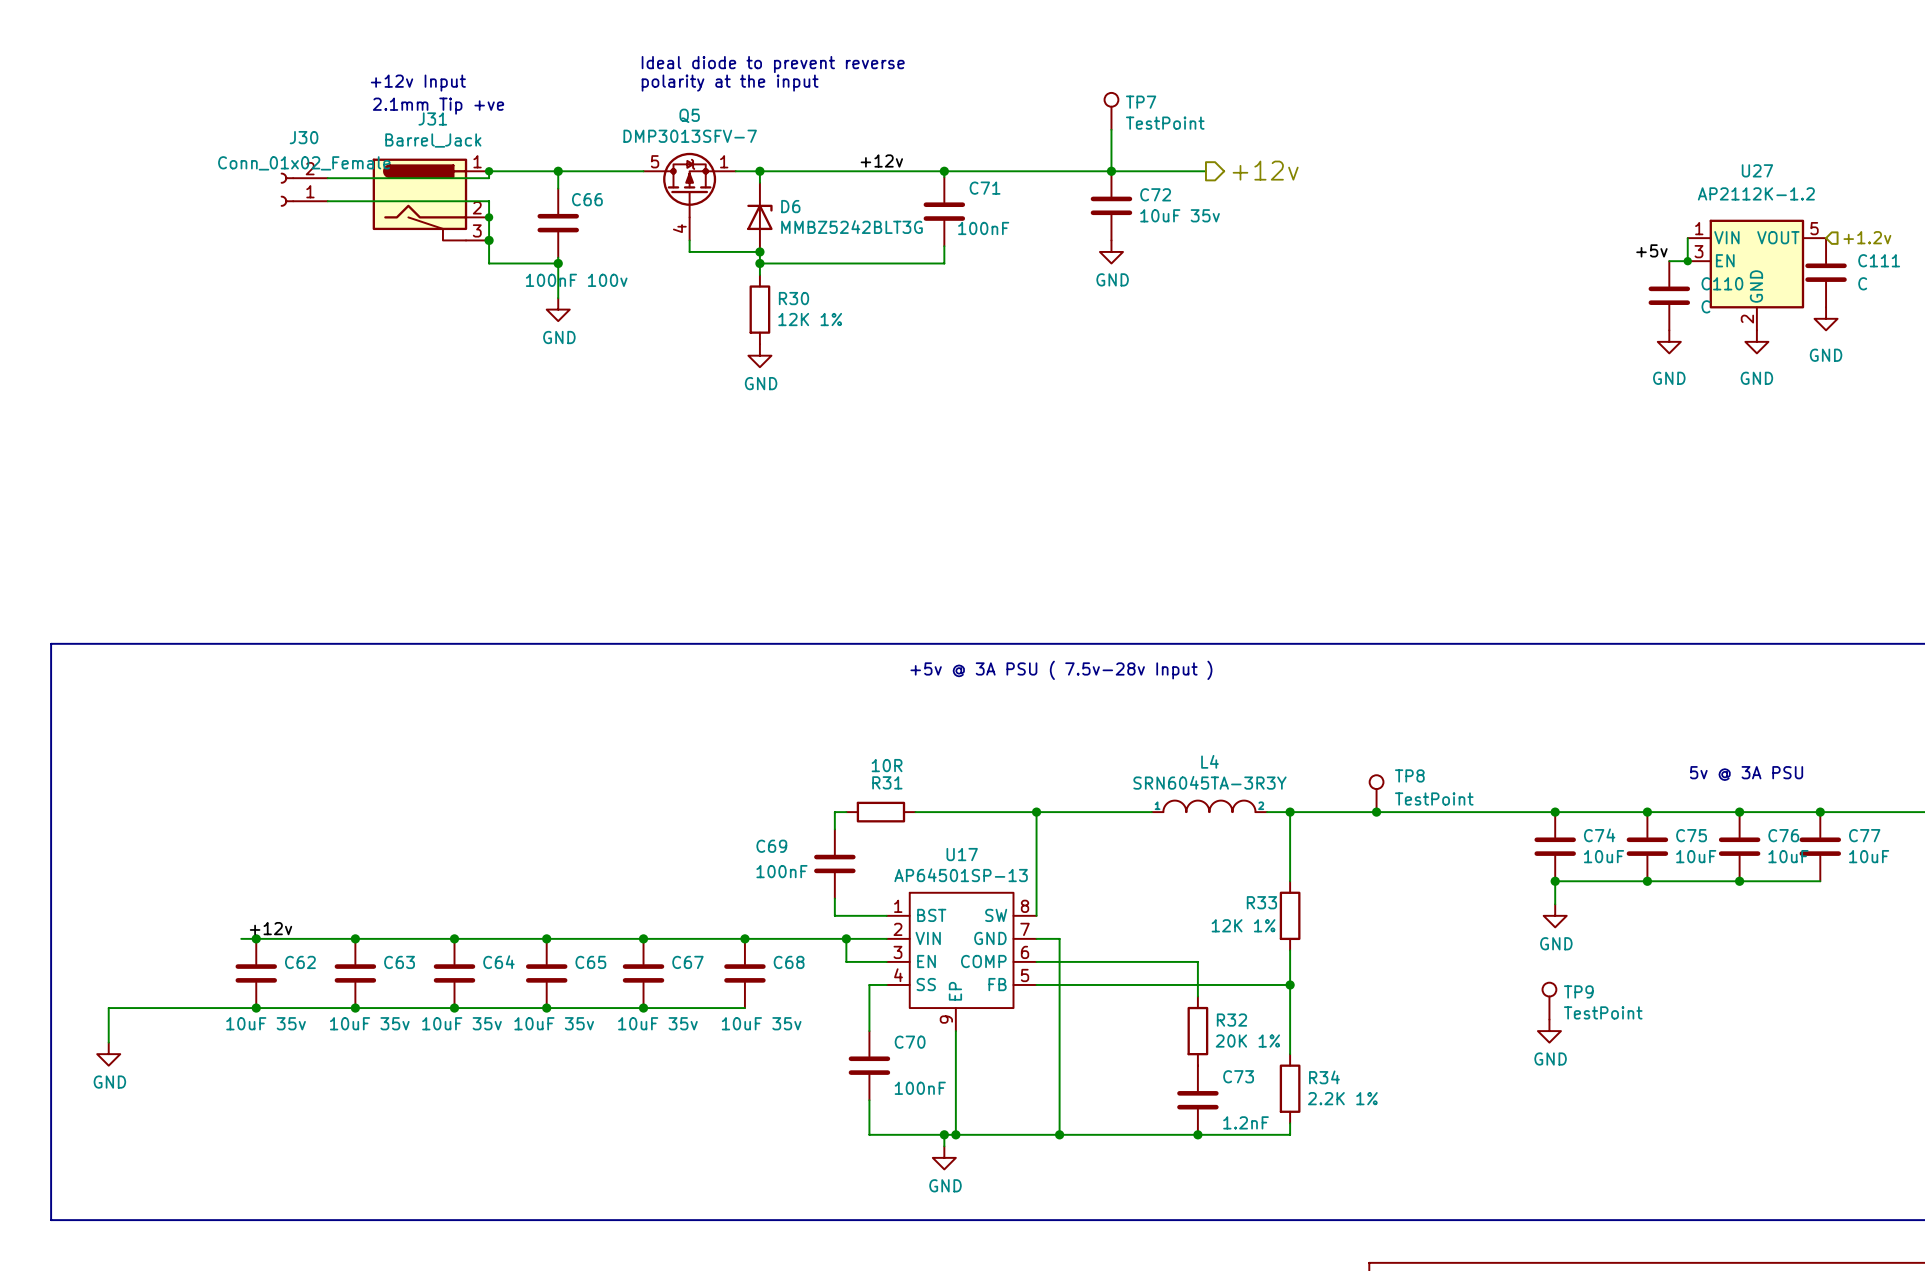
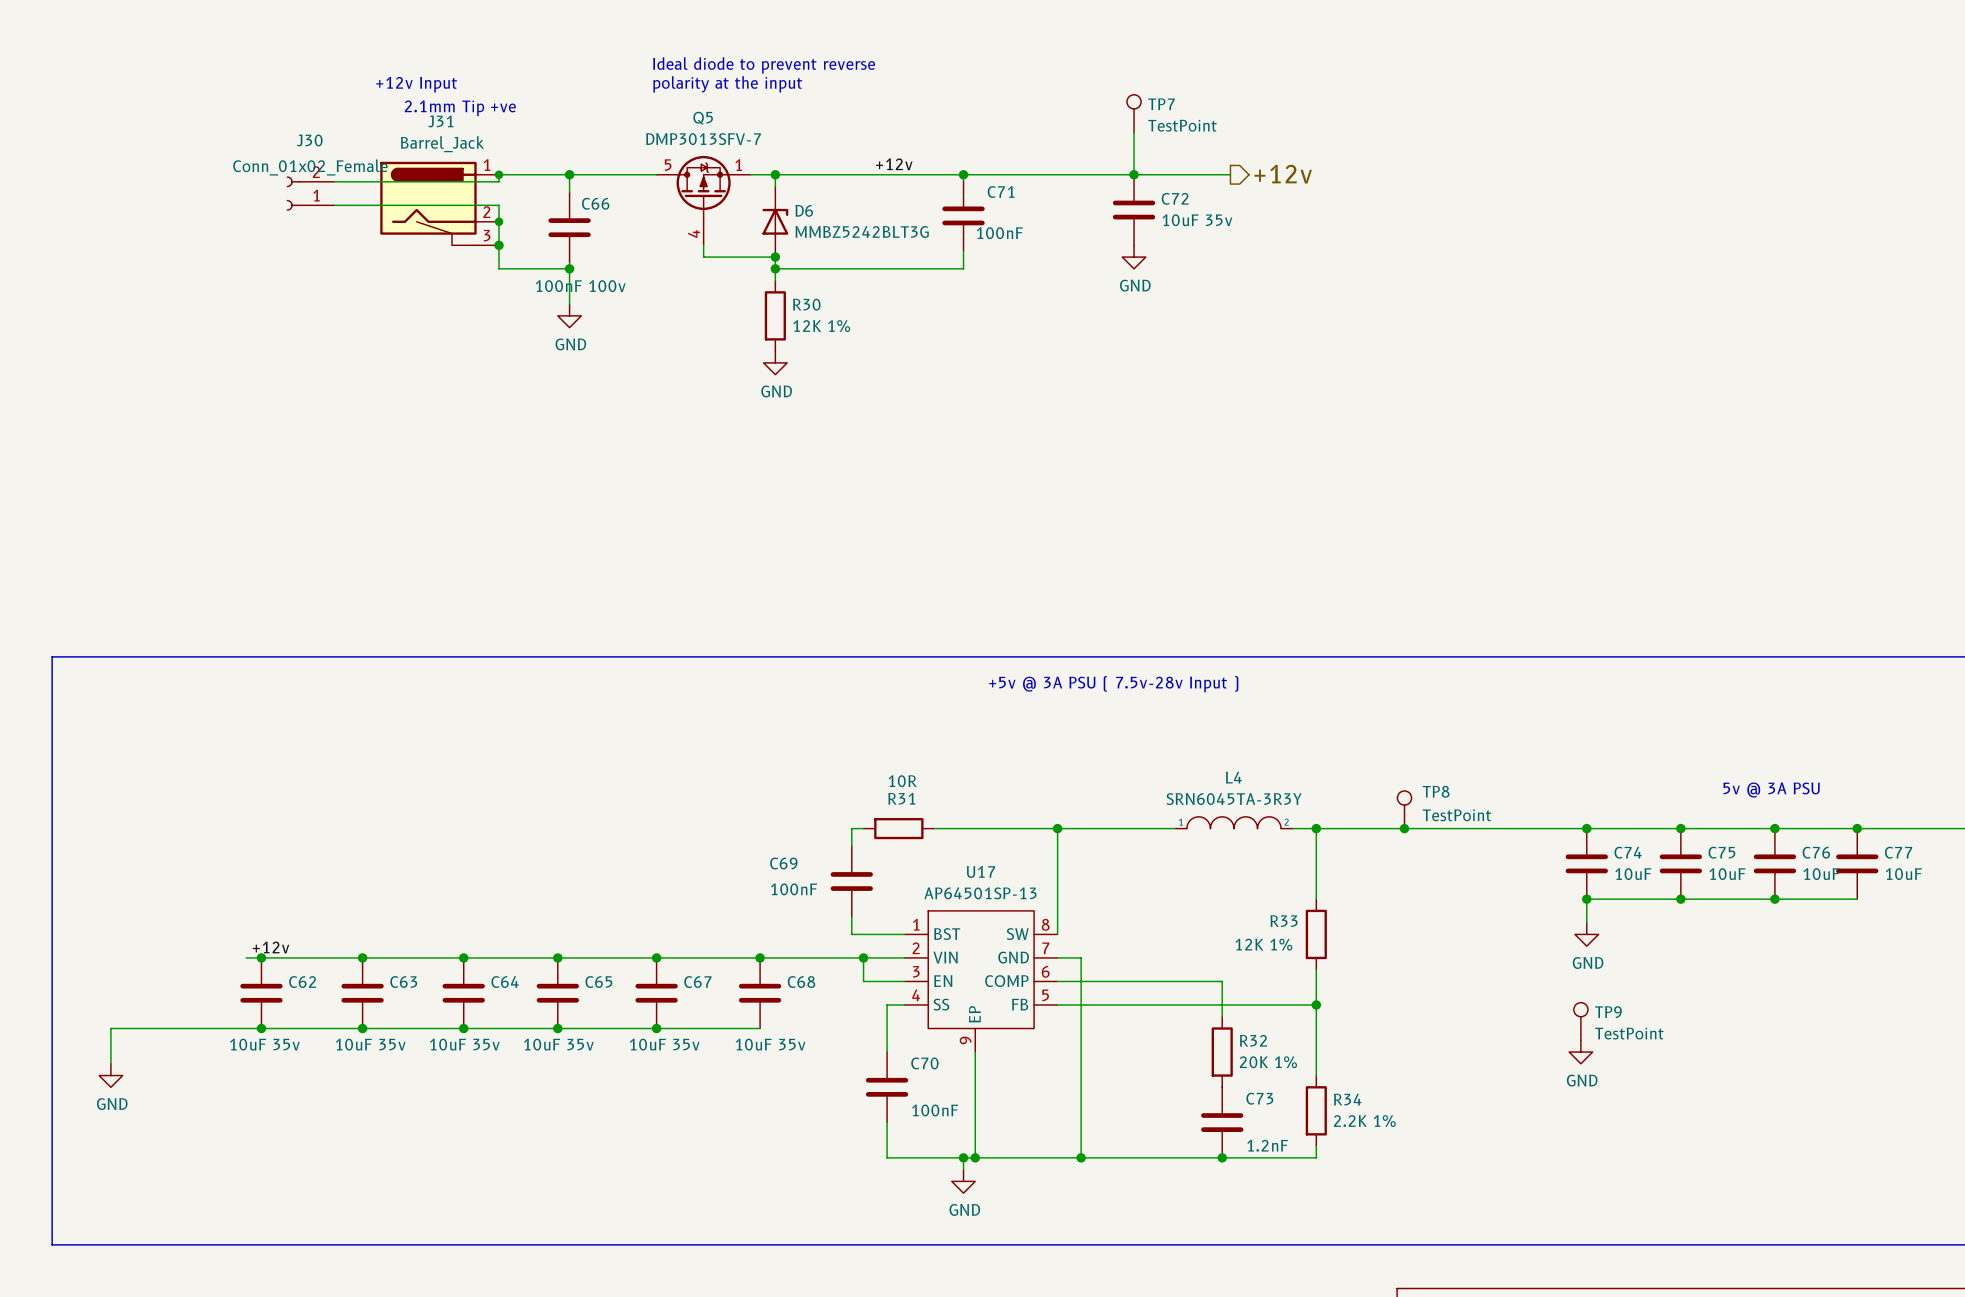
hierarchical label: +1.2v (1867, 237) -> none
wire: (1687, 238) (1687, 261) (1669, 261) -> none
label: +5v (1651, 250) -> none
junction: (1687, 261) -> none
C111: C (1826, 272) -> none
U27: AP2112K-1.2 (1756, 275) -> none
C110: C (1669, 295) -> none
power symbol: GND (1826, 318) -> none
power symbol: GND (1669, 341) -> none
power symbol: GND (1756, 341) -> none

